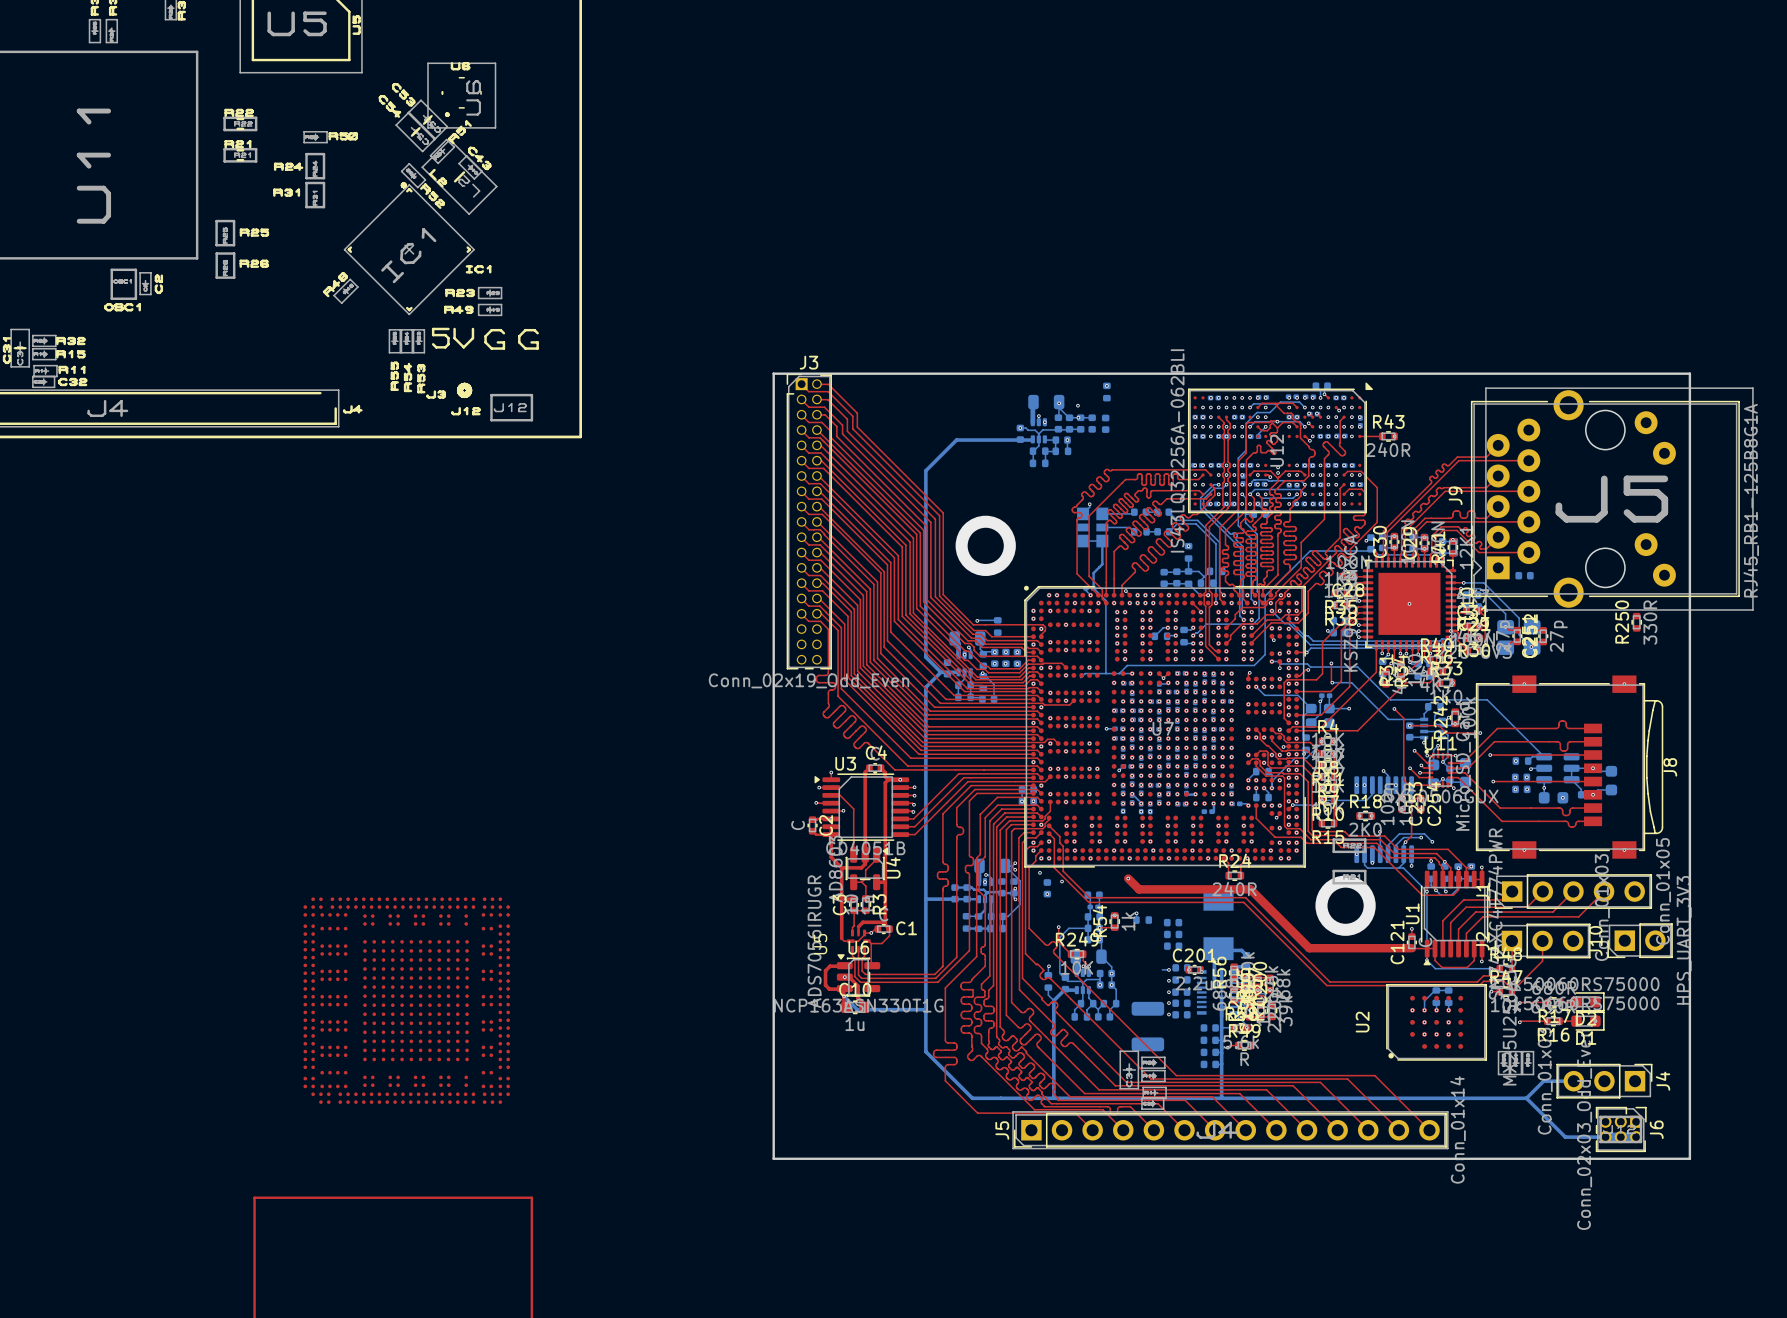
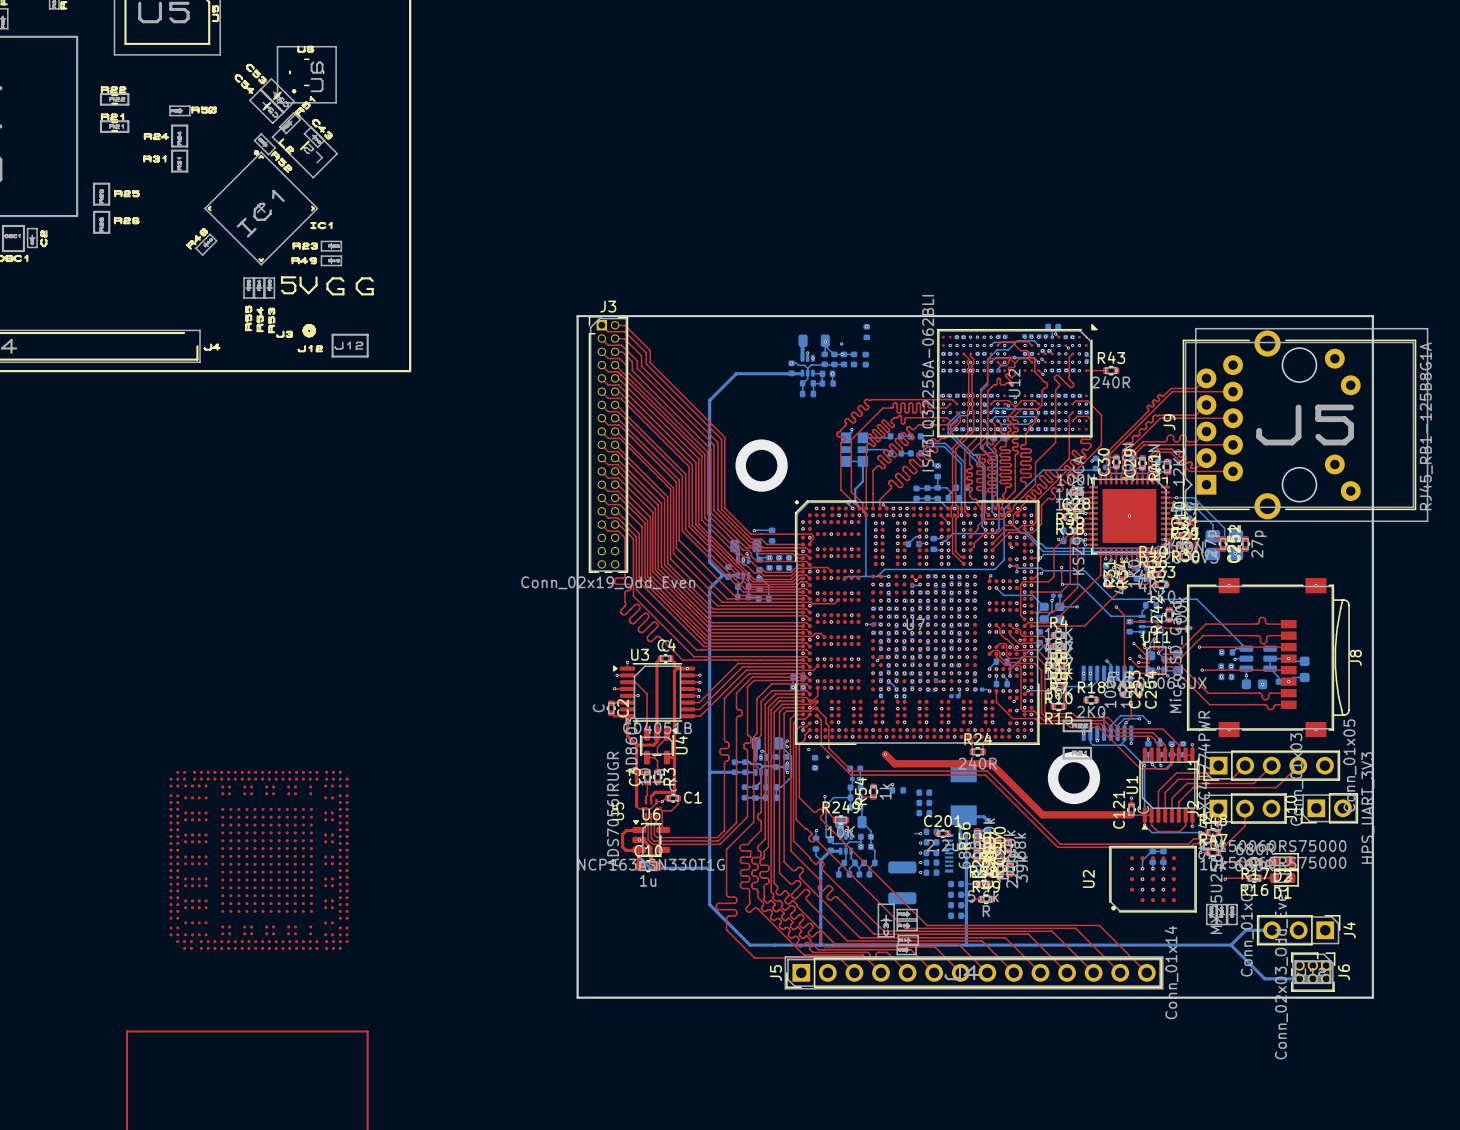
part: (1524, 575) -> none
R250: 330R (1636, 622) -> none

